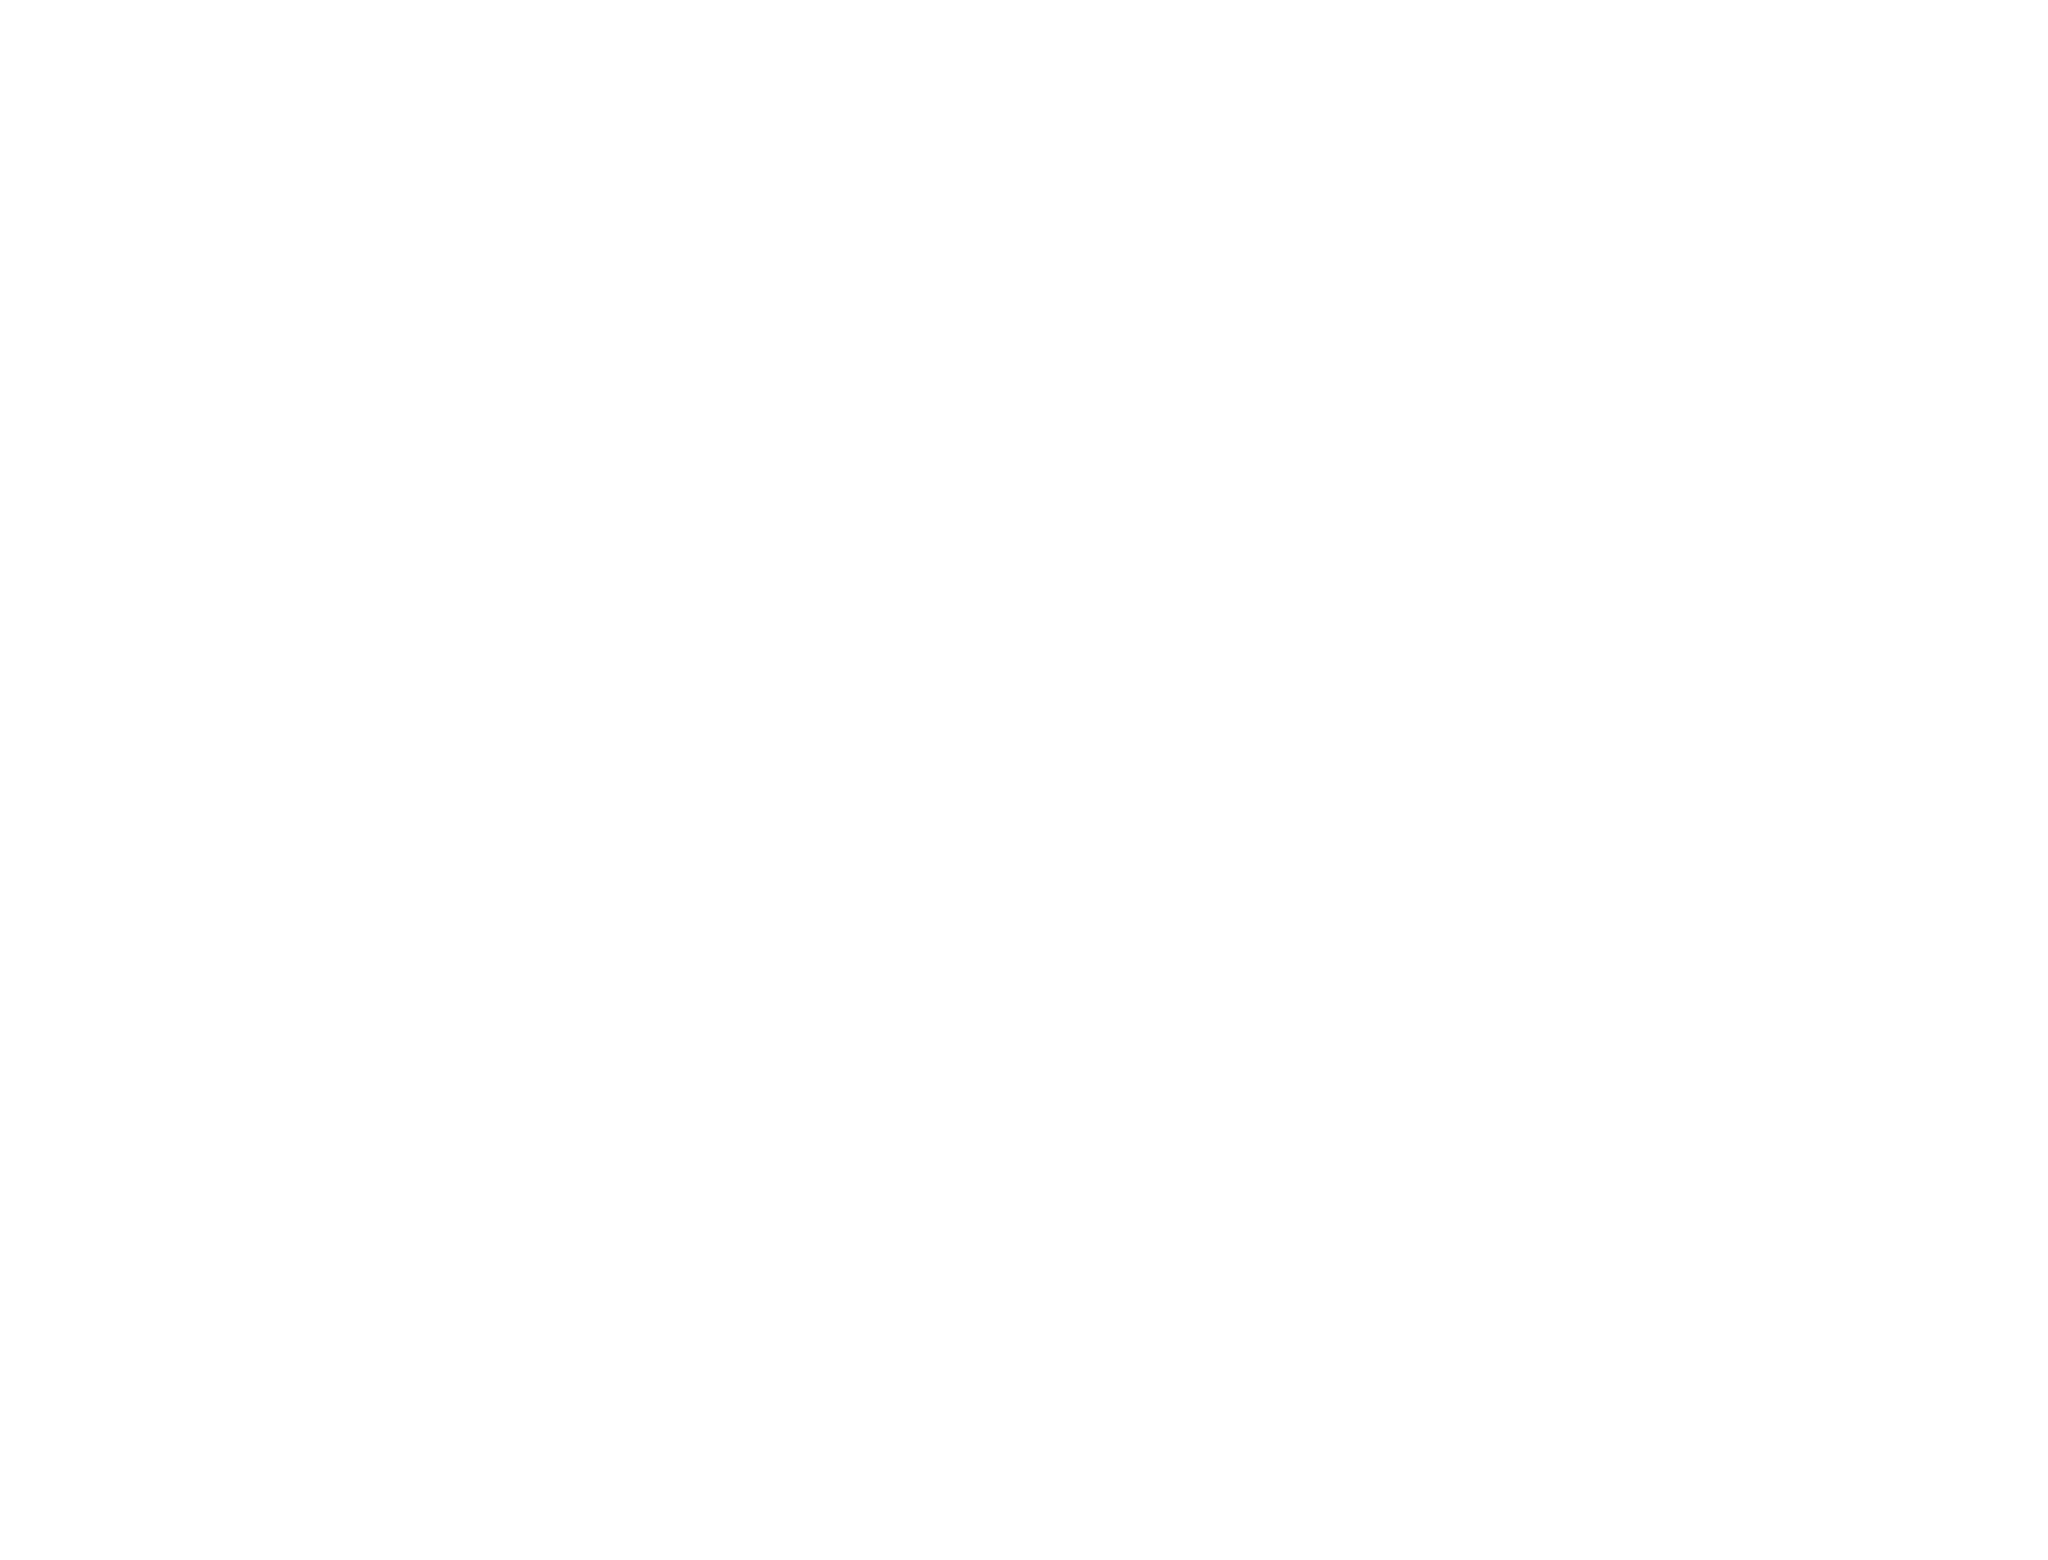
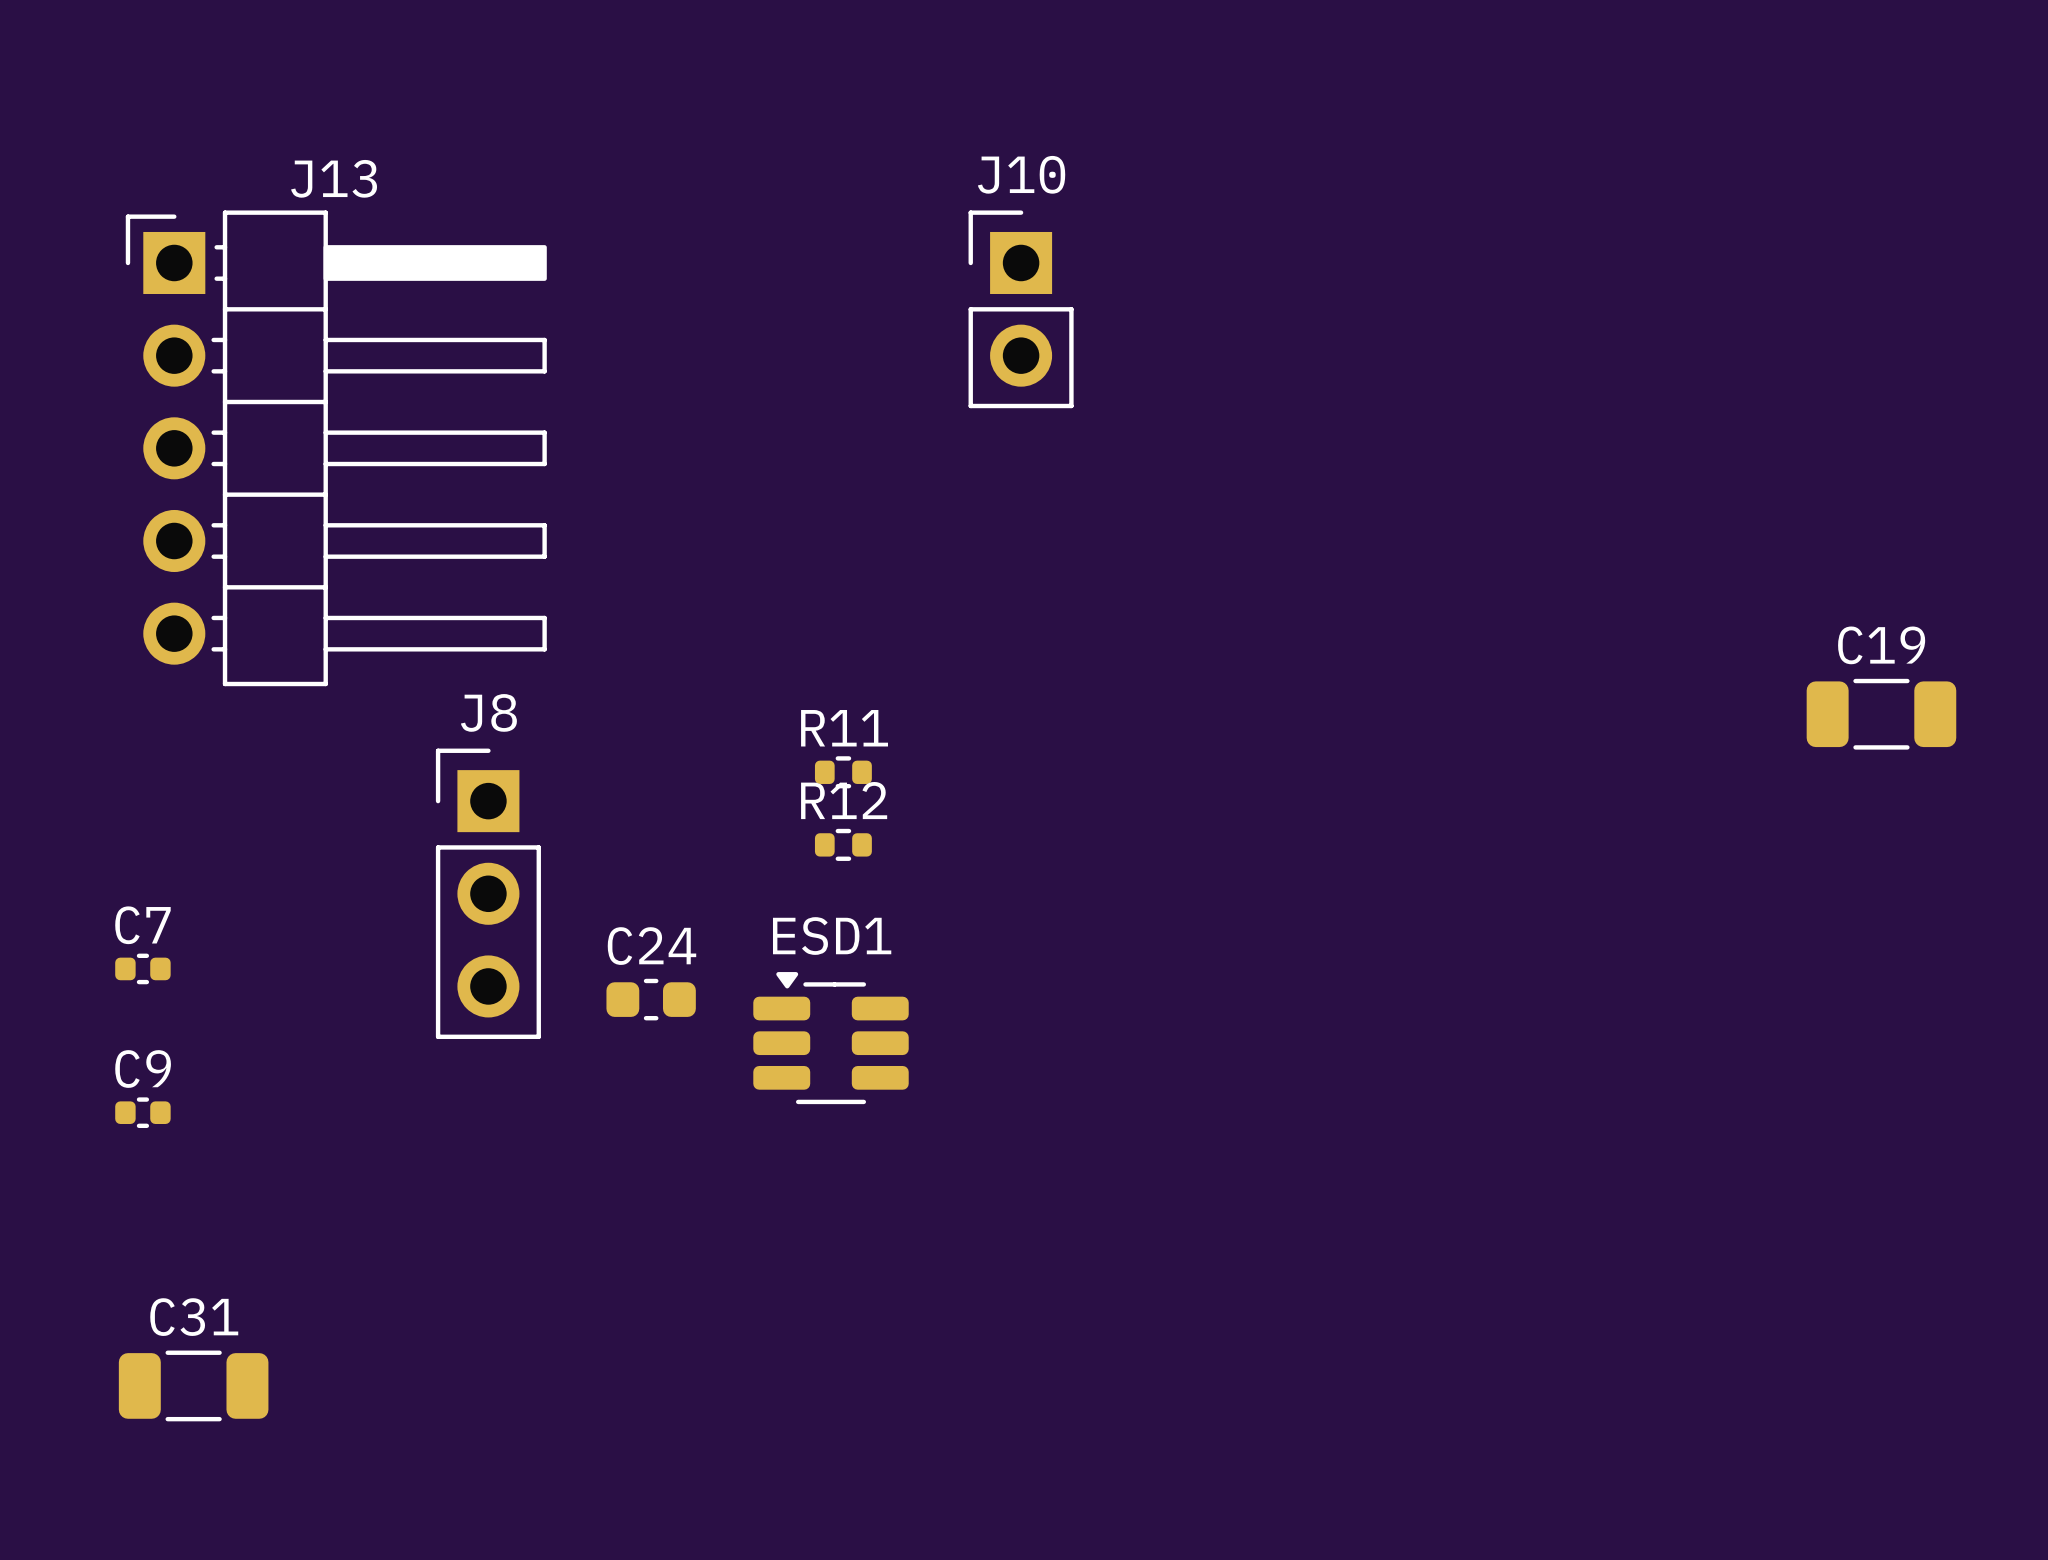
J10: none -> (1021, 309)
J13: none -> (336, 448)
C19: none -> (1881, 714)
R11: none -> (843, 772)
R12: none -> (843, 844)
J8: none -> (488, 893)
C7: none -> (142, 968)
C24: none -> (651, 999)
ESD1: none -> (831, 1038)
C9: none -> (142, 1112)
C31: none -> (193, 1385)

